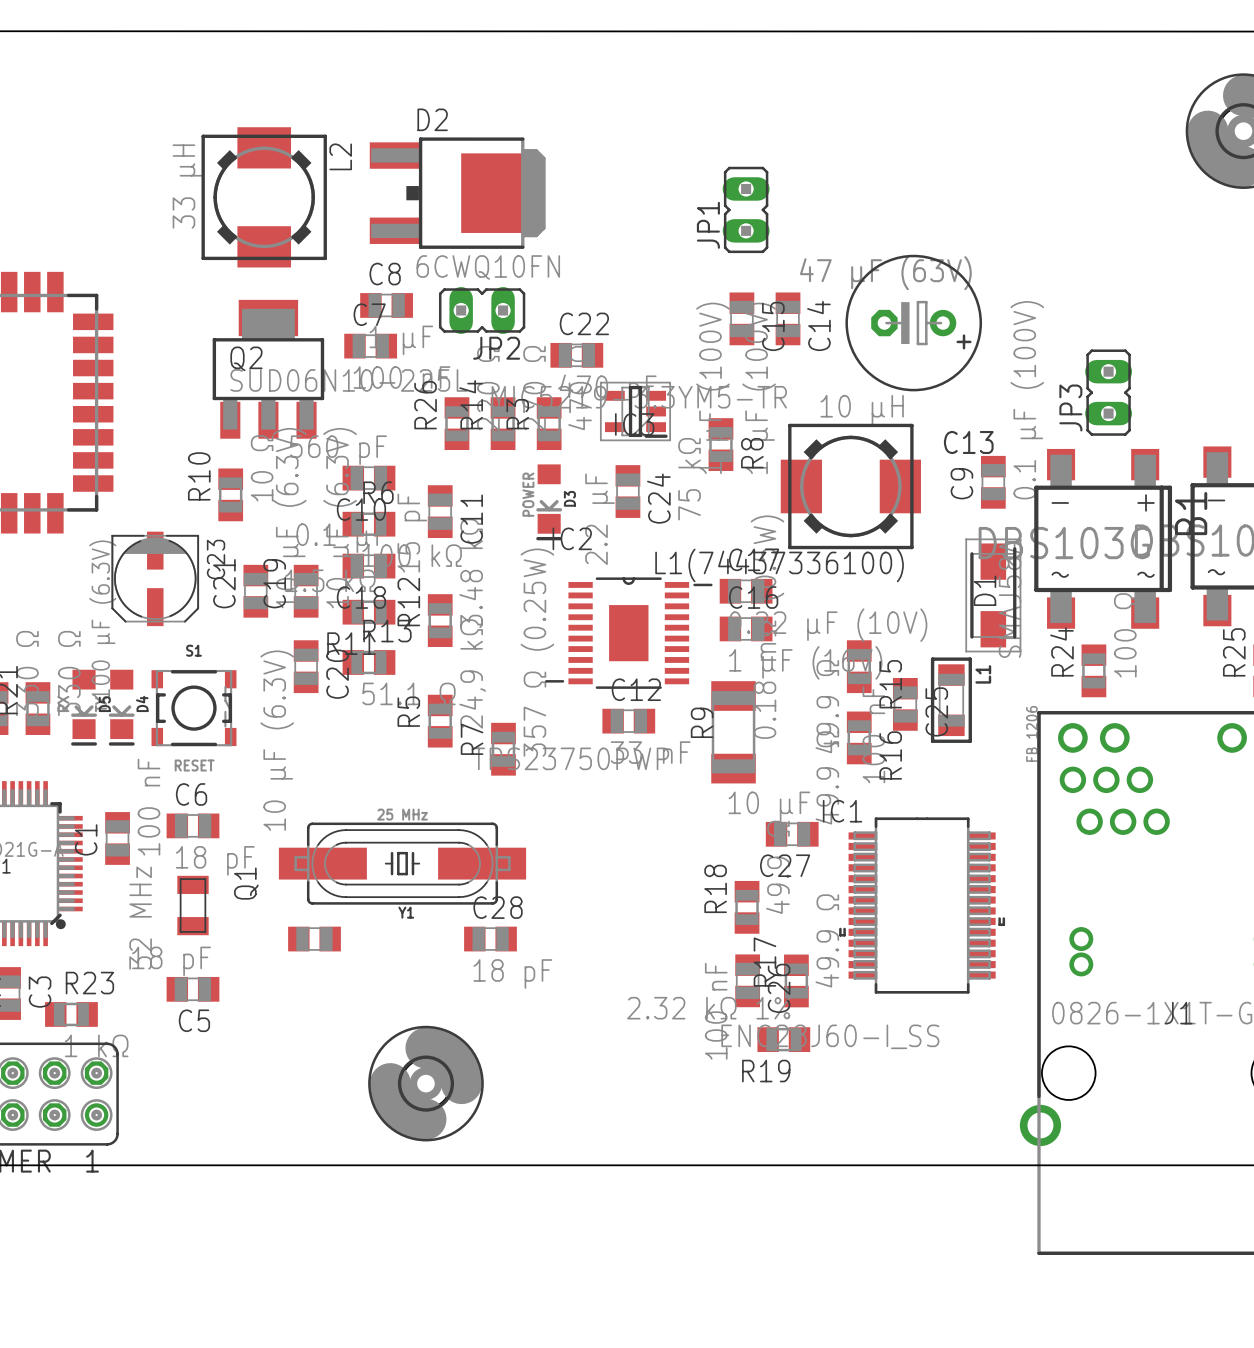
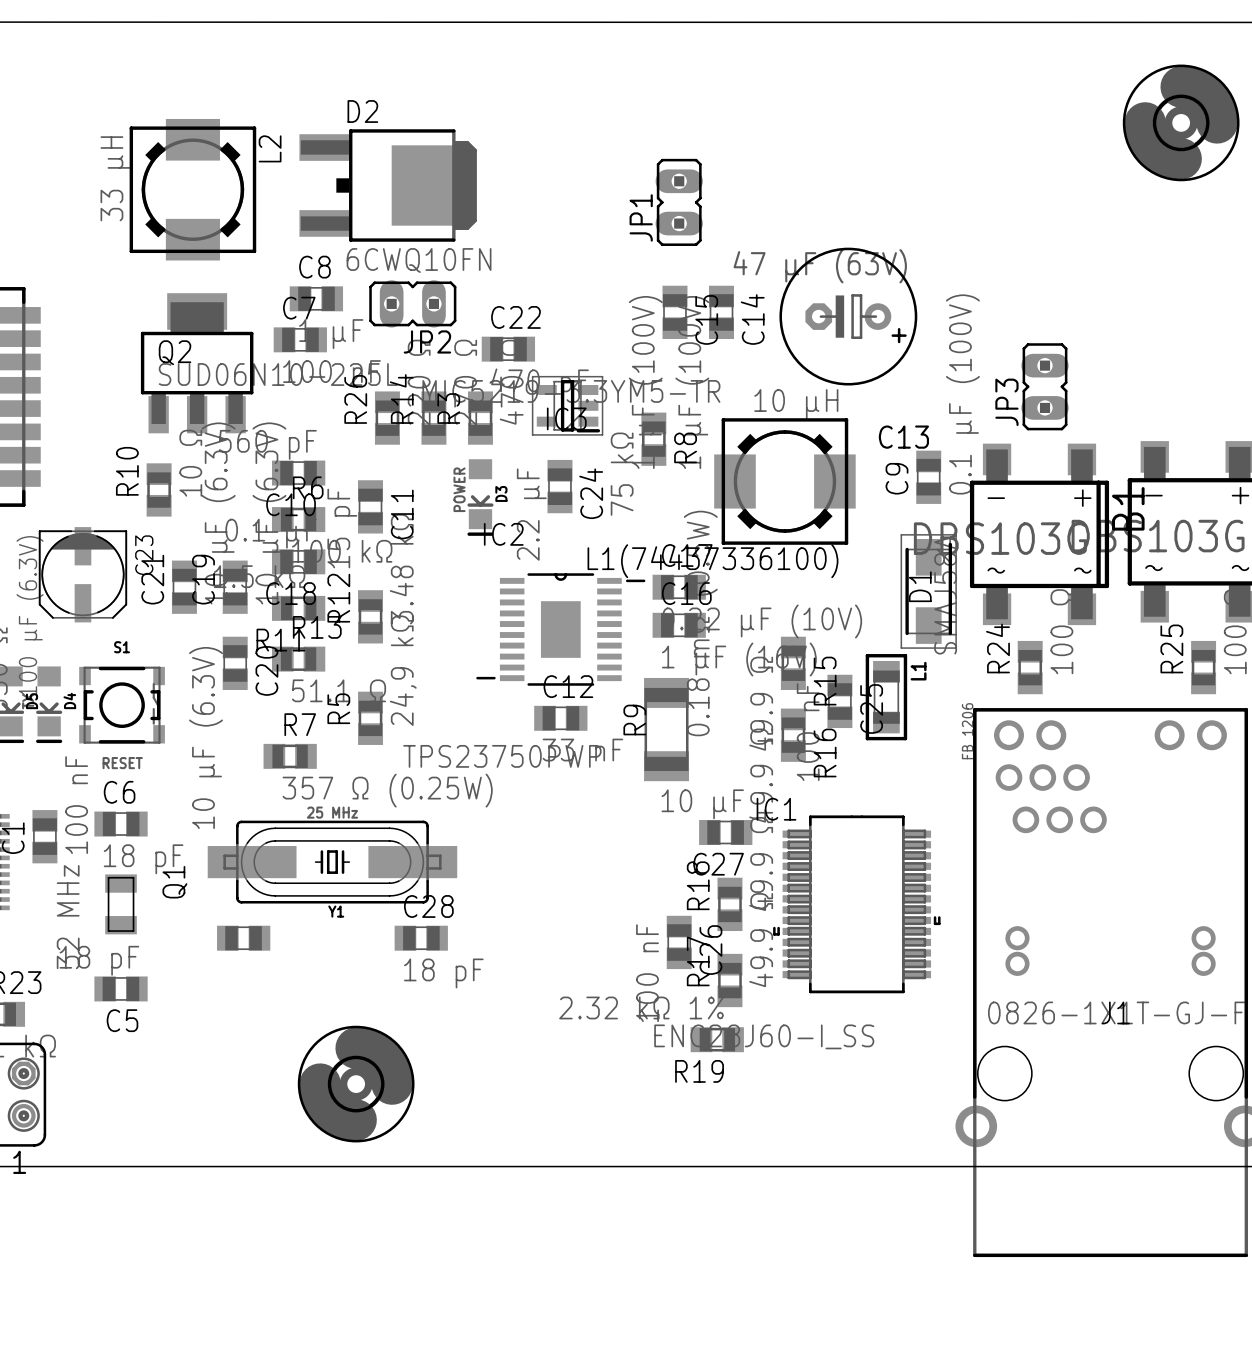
R7 rotation: 0° (503, 749) -> 90° clockwise (290, 756)
R7 position: (503, 749) -> (290, 756)
R18 position: (747, 907) -> (729, 904)
C26 position: (747, 980) -> (679, 942)

